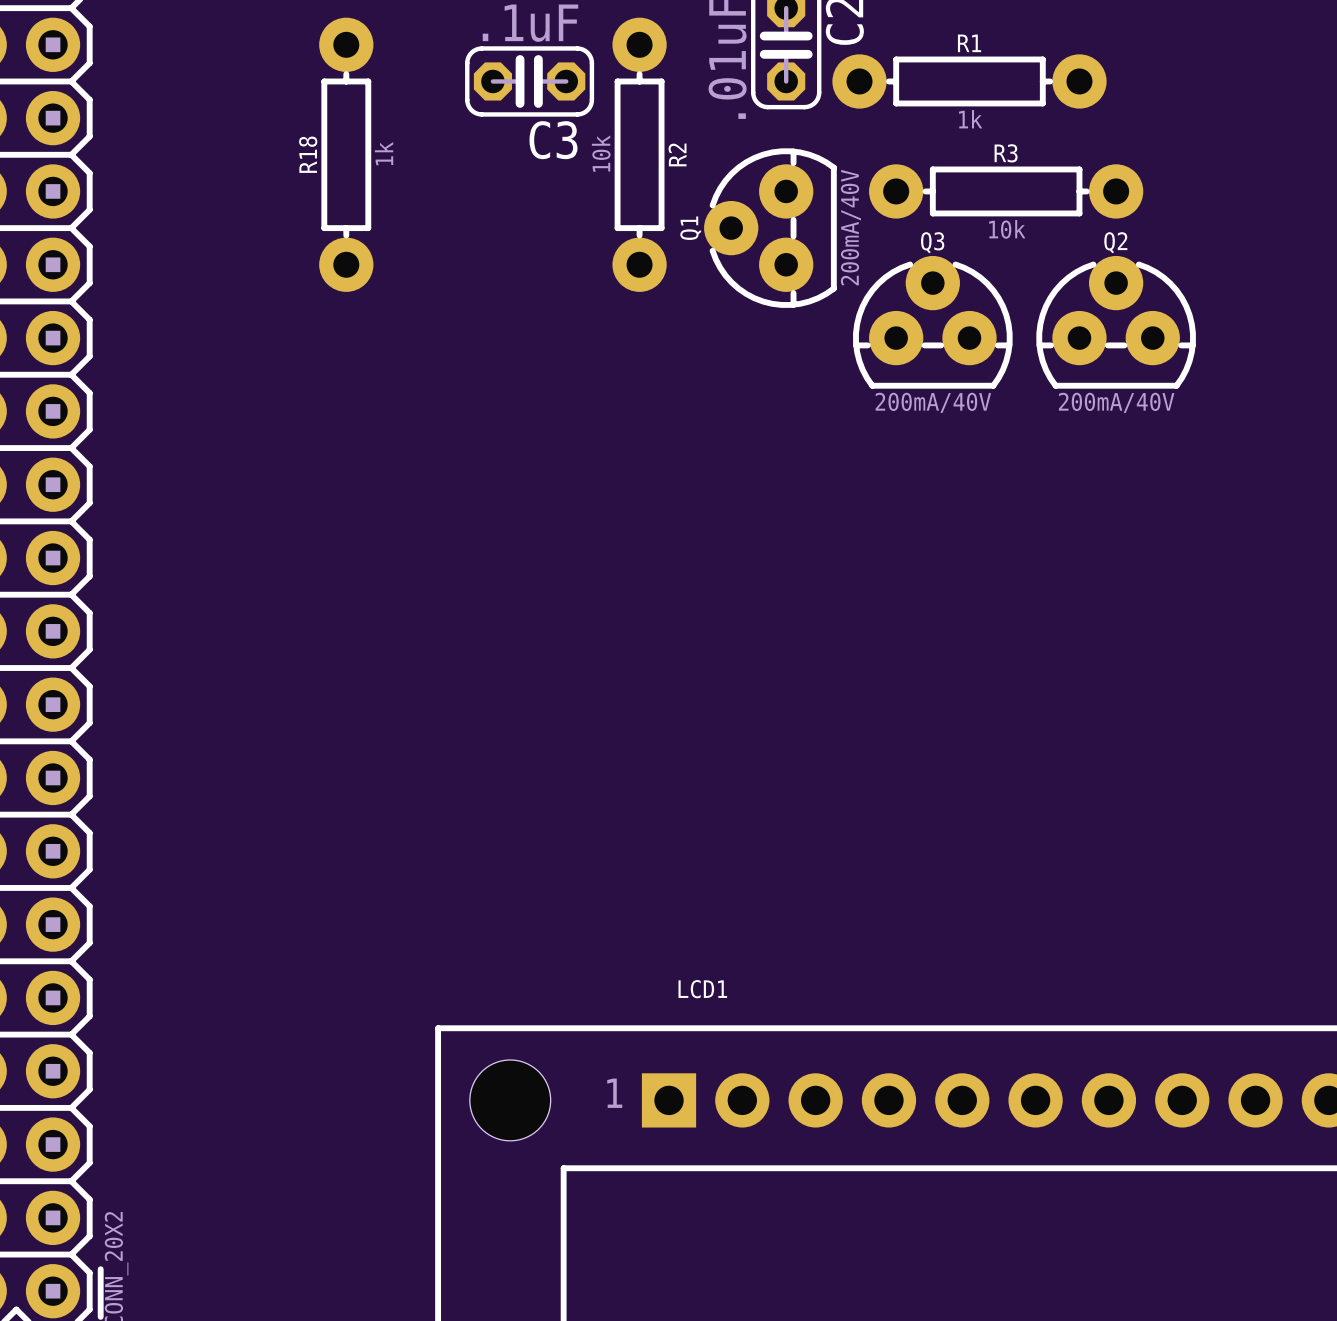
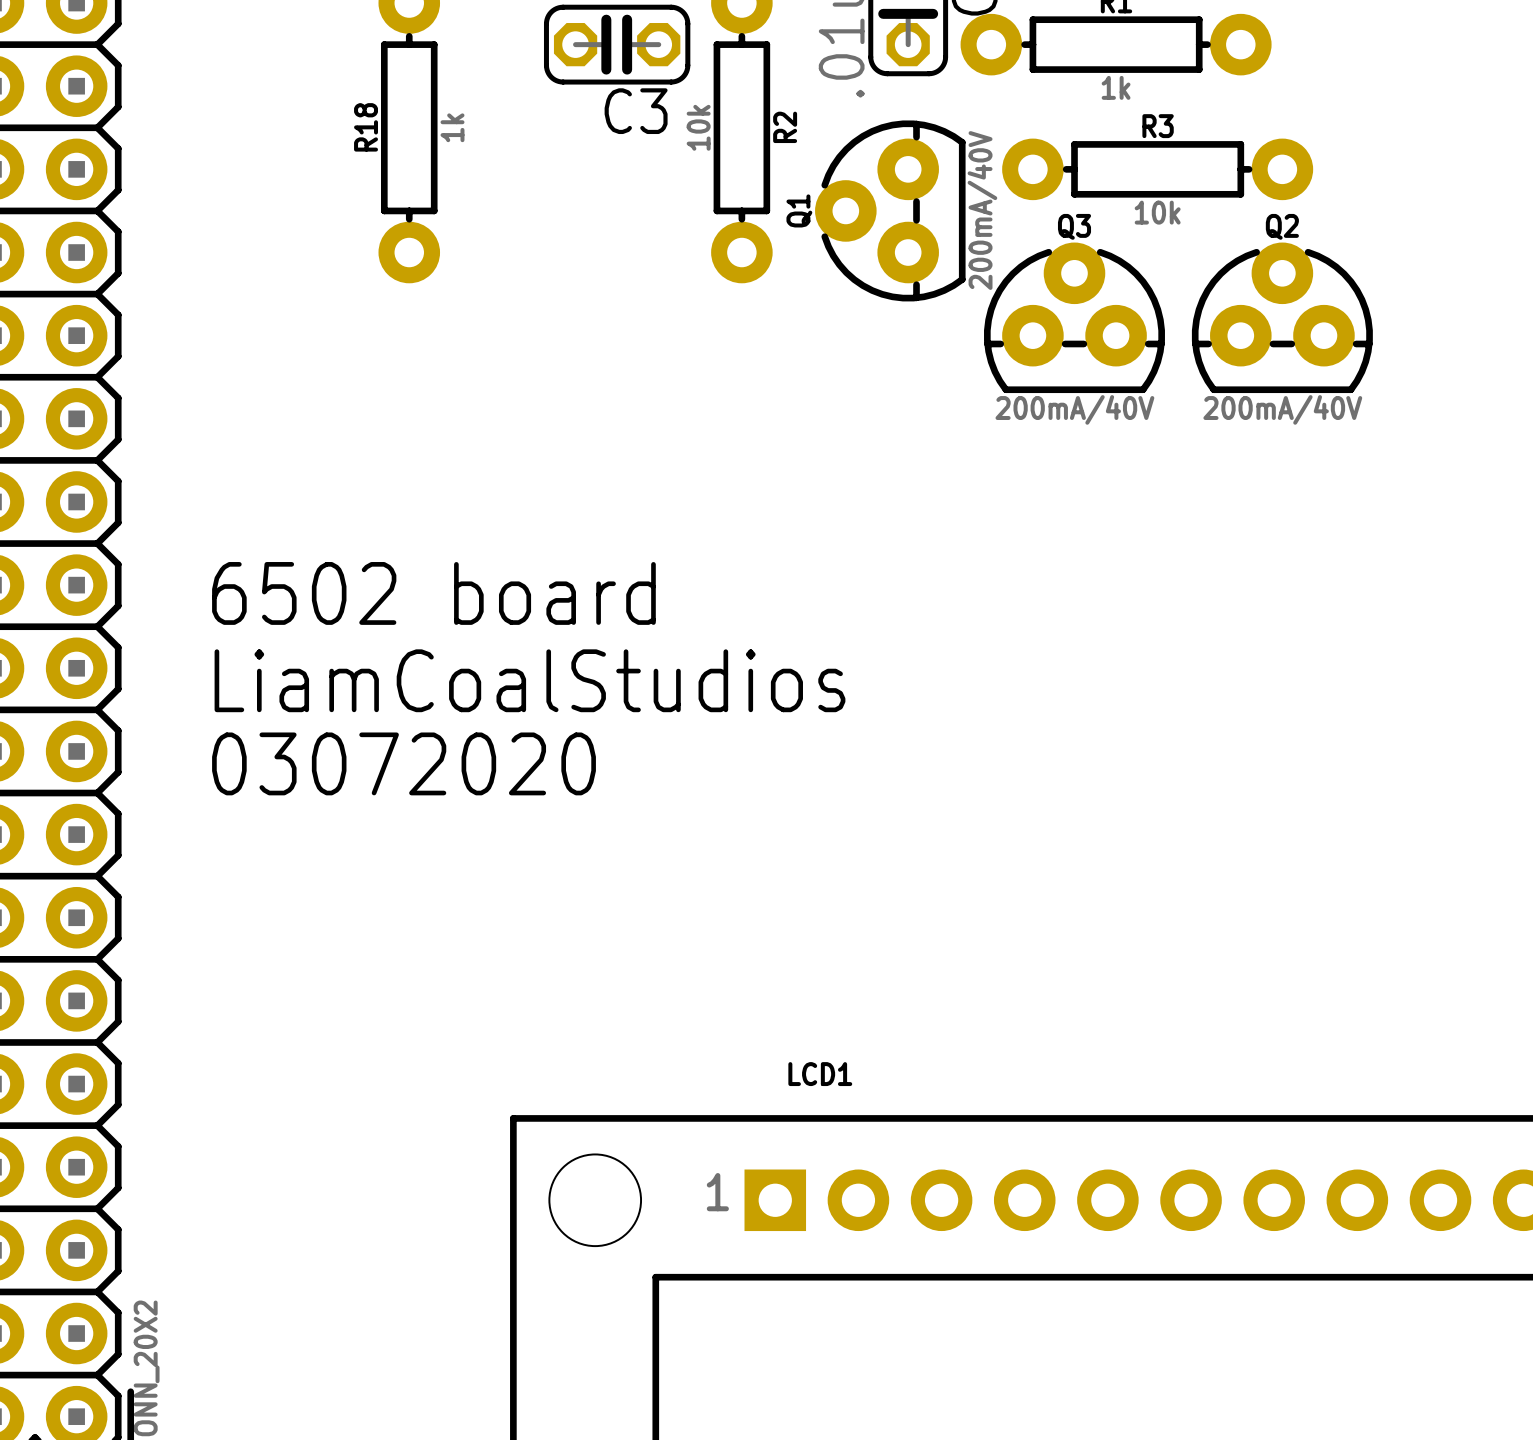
text: none -> 6502 board (433, 593)
text: none -> LiamCoalStudios (529, 680)
text: none -> 03072020 (404, 763)

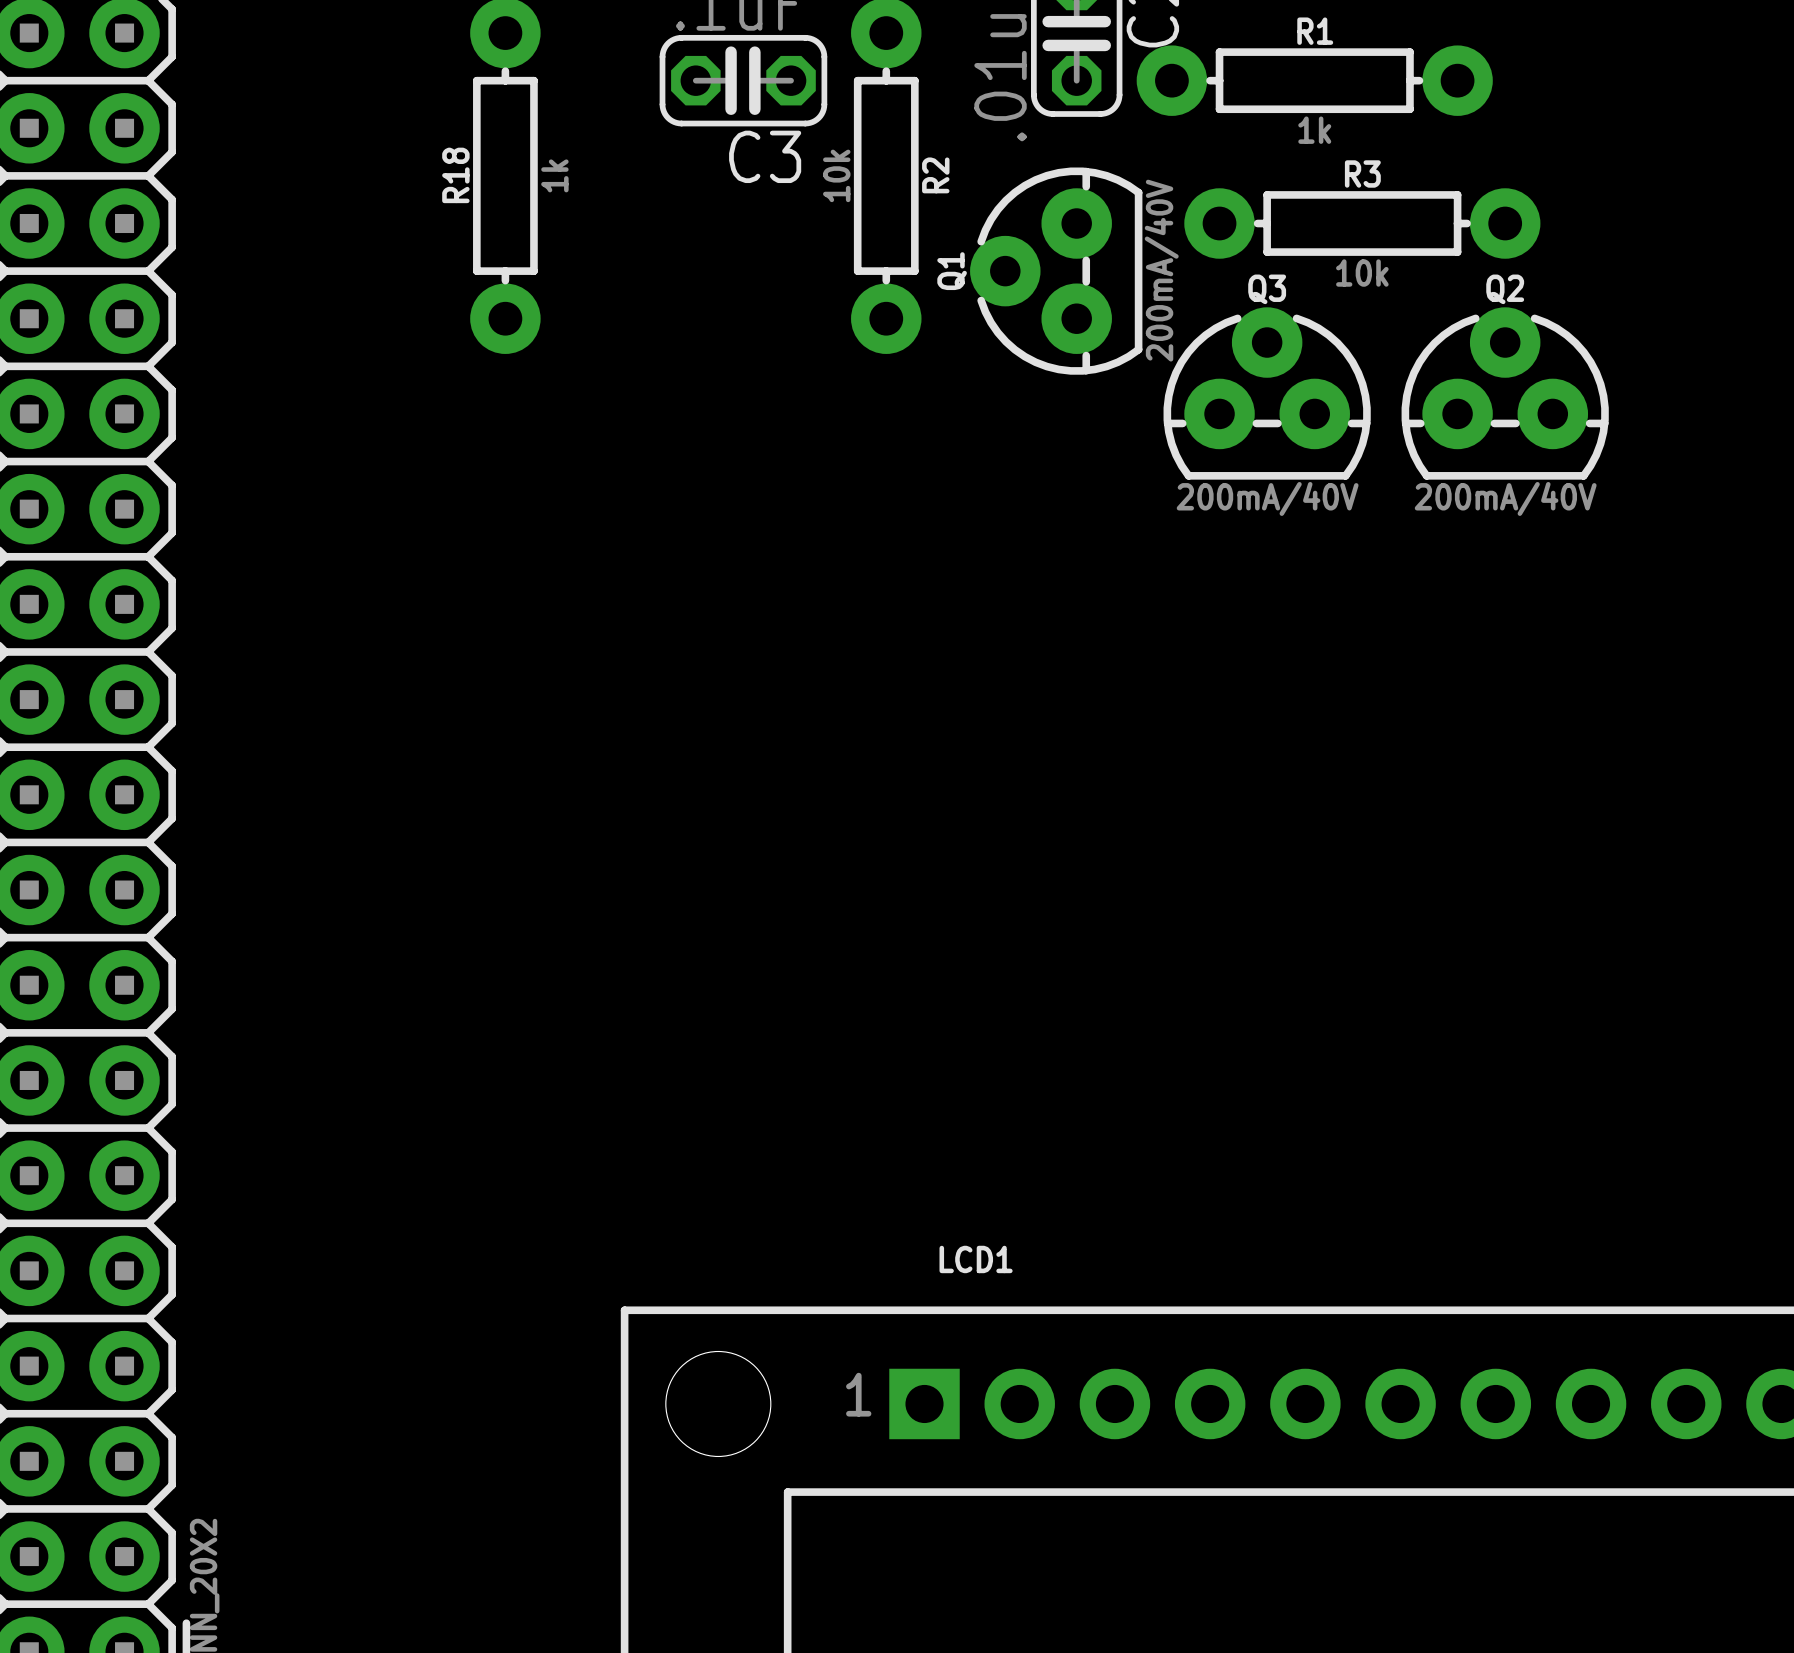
text: 6502 board (433, 593) -> none
text: LiamCoalStudios (529, 680) -> none
text: 03072020 (404, 763) -> none

